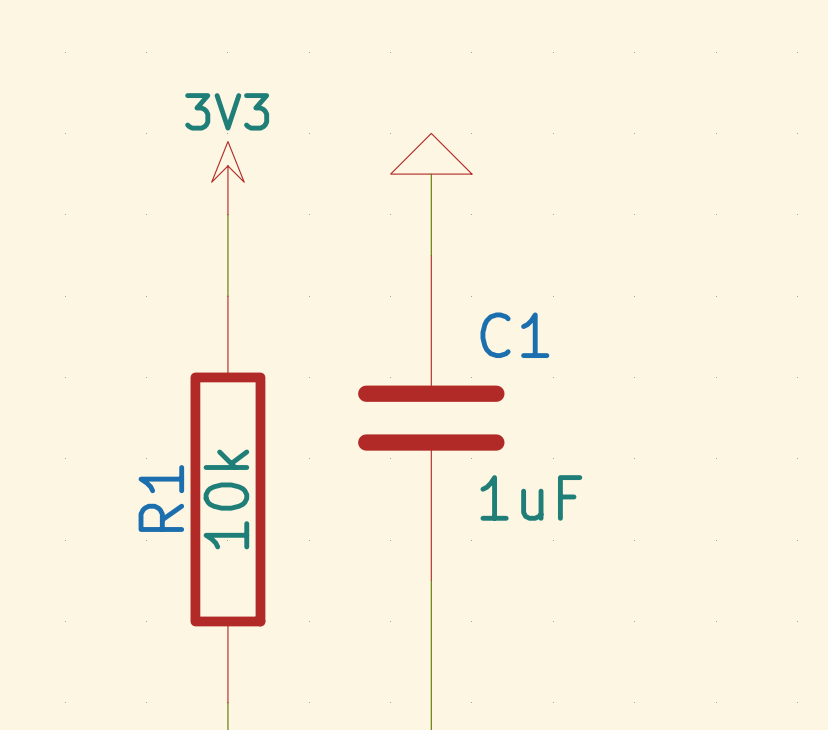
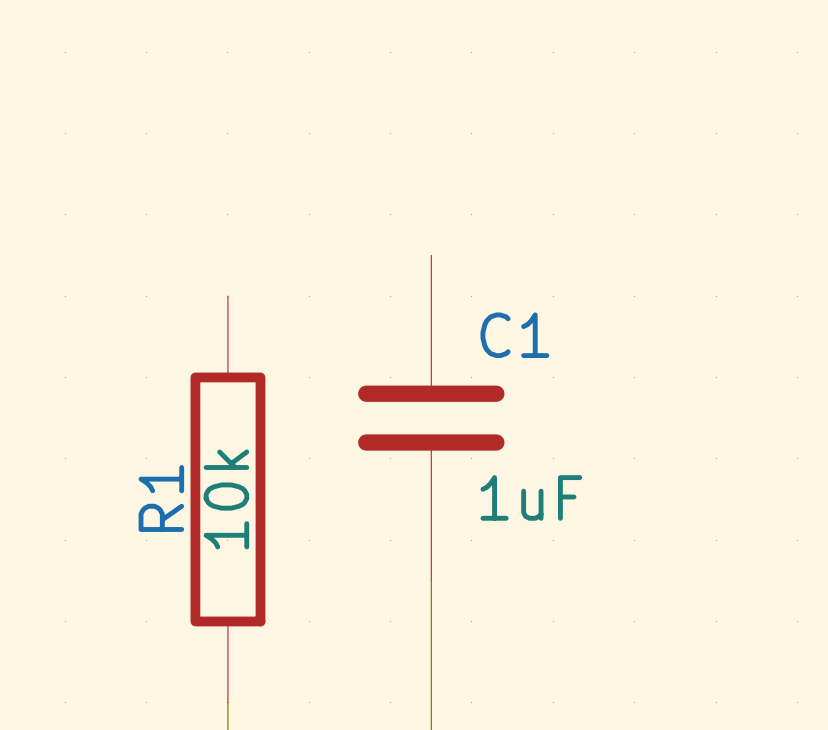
power symbol: (431, 153) -> none
wire: (431, 174) (431, 255) -> none
power symbol: 3V3 (227, 178) -> none
wire: (227, 214) (227, 296) -> none

